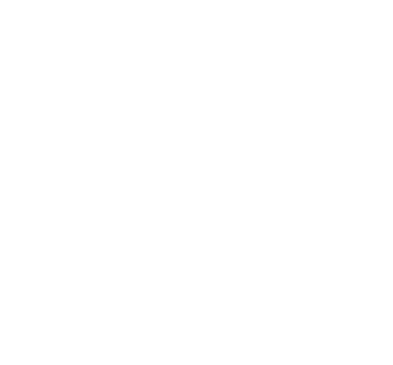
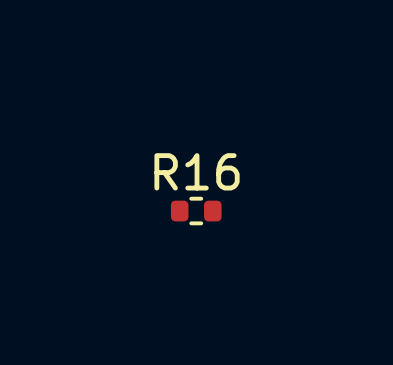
R16: none -> (196, 211)

